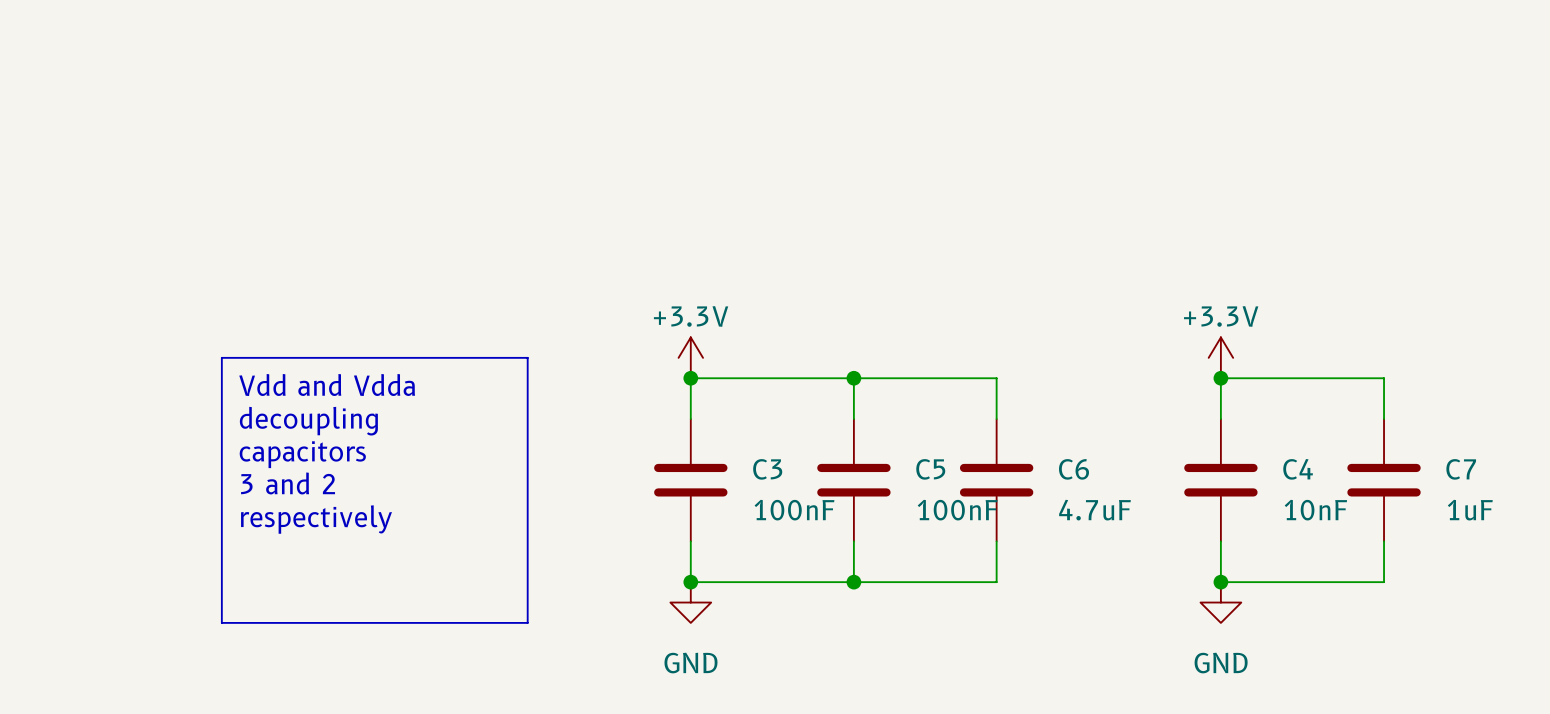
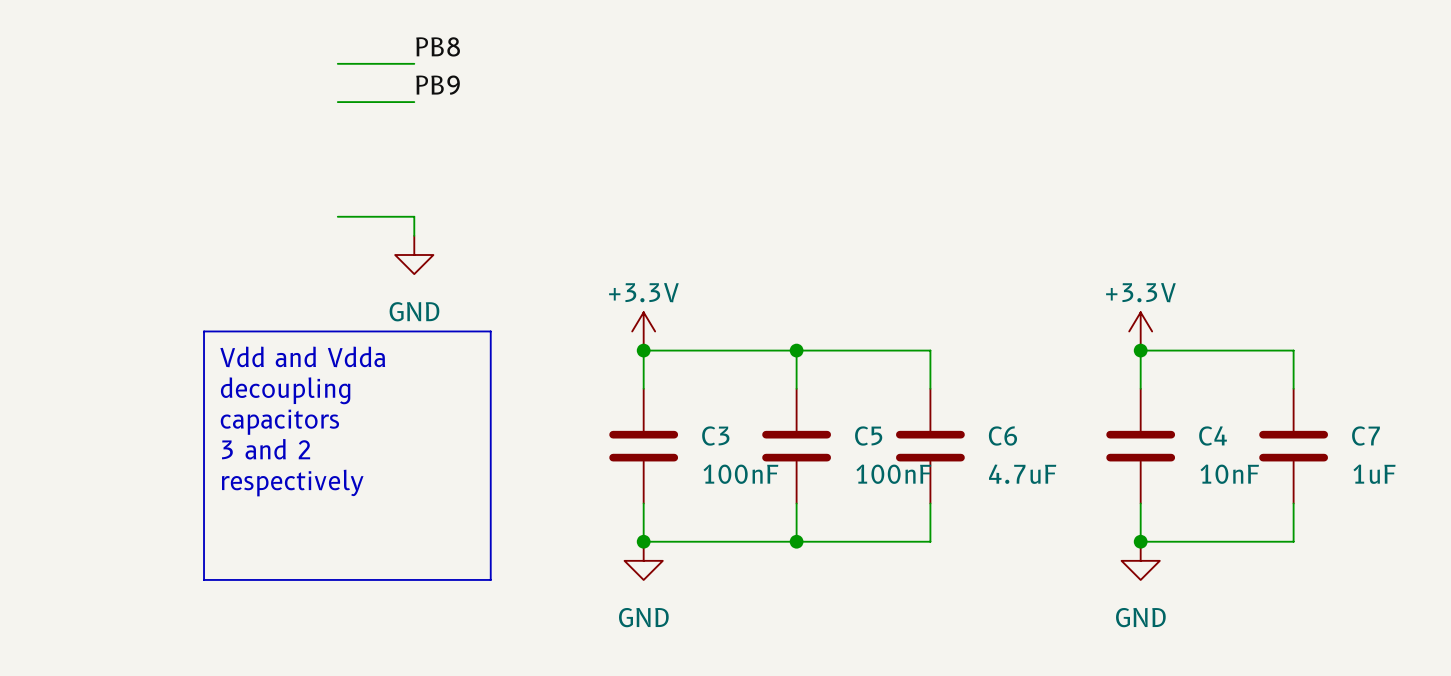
label: none -> PB8 (438, 46)
wire: none -> (337, 63) (414, 63)
label: none -> PB9 (438, 85)
wire: none -> (337, 102) (414, 102)
wire: none -> (337, 216) (414, 216) (414, 235)
power symbol: none -> GND (414, 255)

